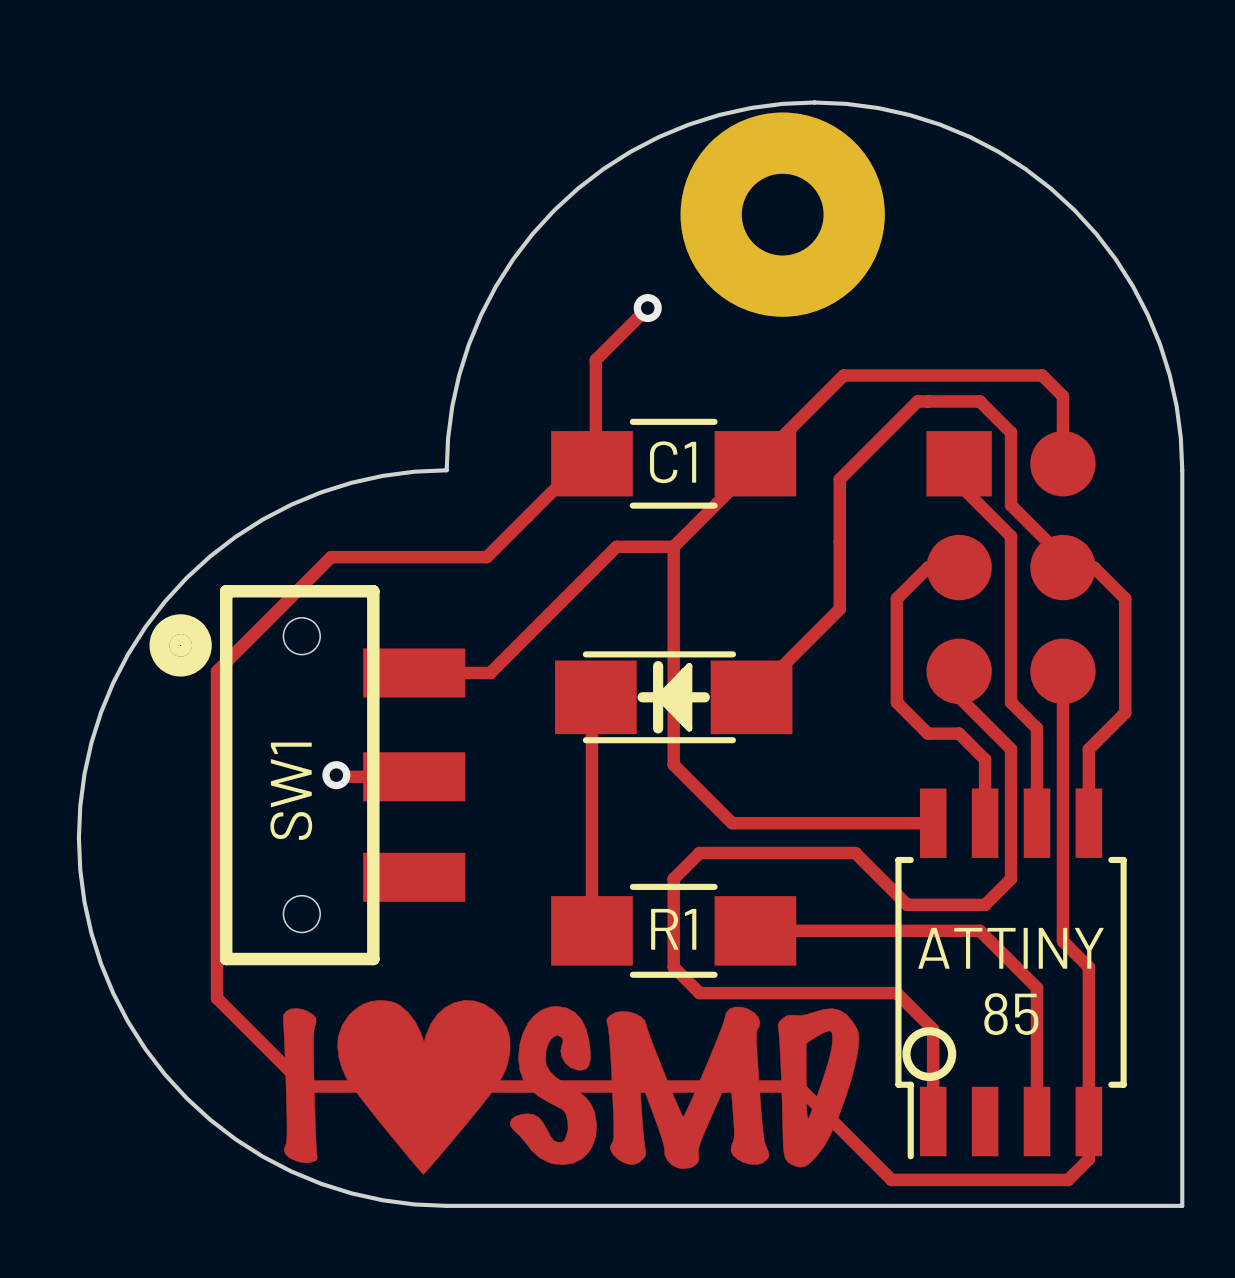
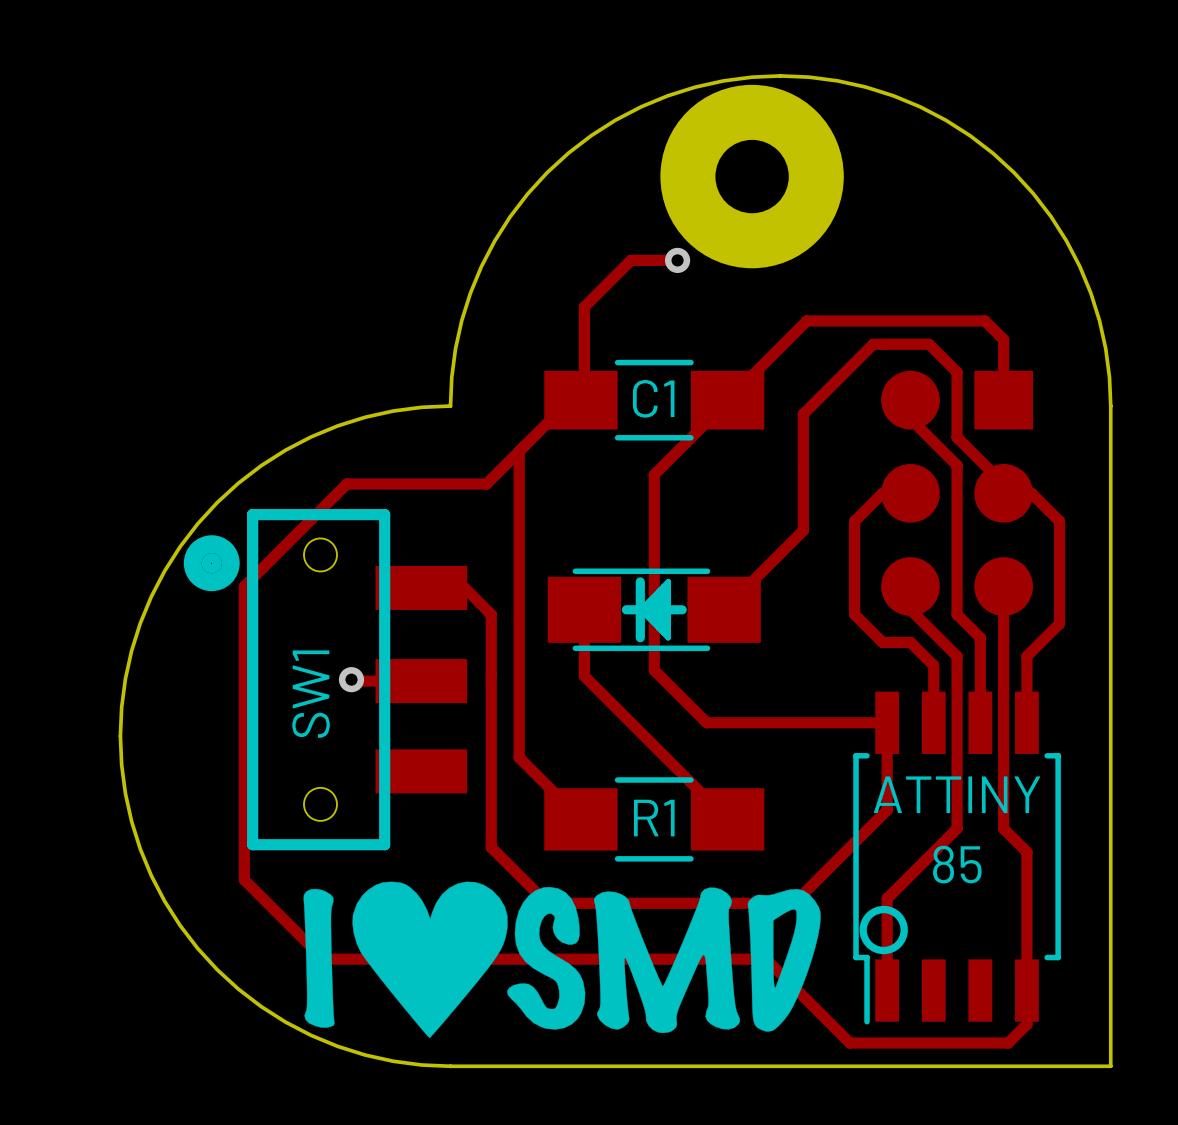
track: none -> (630, 260) (677, 260)
via position: (647, 308) -> (677, 260)
part footprint: [926, 431, 1096, 705] -> [881, 370, 1033, 616]
track: (673, 546) (616, 546) (490, 672) (462, 672) -> (887, 722) (887, 810) (794, 903) (547, 903) (491, 847) (491, 614) (464, 587)
track: (591, 701) (591, 930) -> (519, 451) (519, 757) (580, 819)
track: (1011, 878) (985, 904) (907, 904) (855, 852) (699, 852) (673, 878) (673, 967) (699, 993) (896, 993) (933, 1029) -> (957, 772) (957, 828) (887, 898) (887, 907)
ATTINY name: none -> ATTINY (956, 794)
track: (755, 930) (979, 930) (1036, 987) (1036, 1121) -> (727, 819) (584, 676) (584, 609)
text: ATTINY (1010, 948) -> none
drawing shape: [282, 1000, 860, 1175] -> [303, 881, 821, 1039]
text position: 85 (1011, 1014) -> 85 (957, 864)

